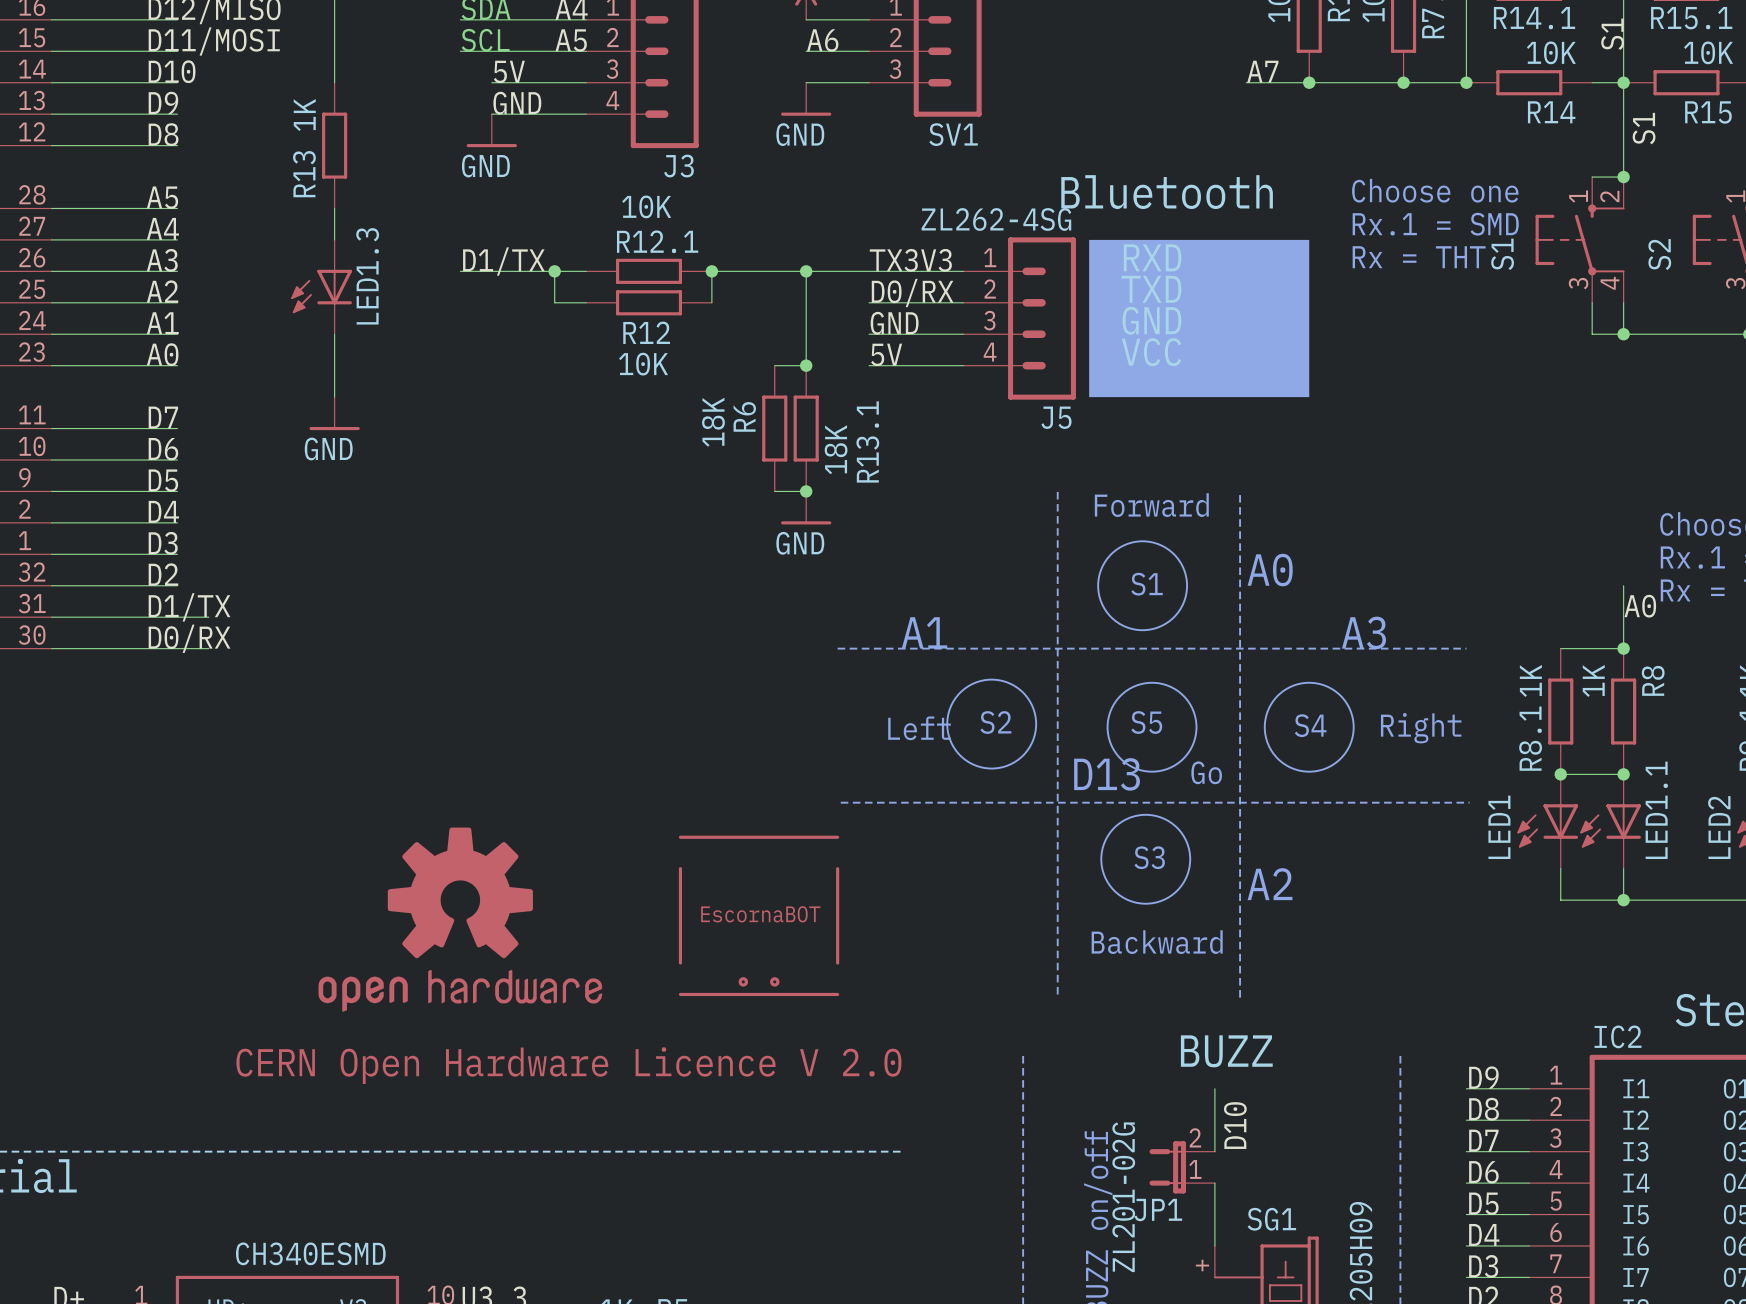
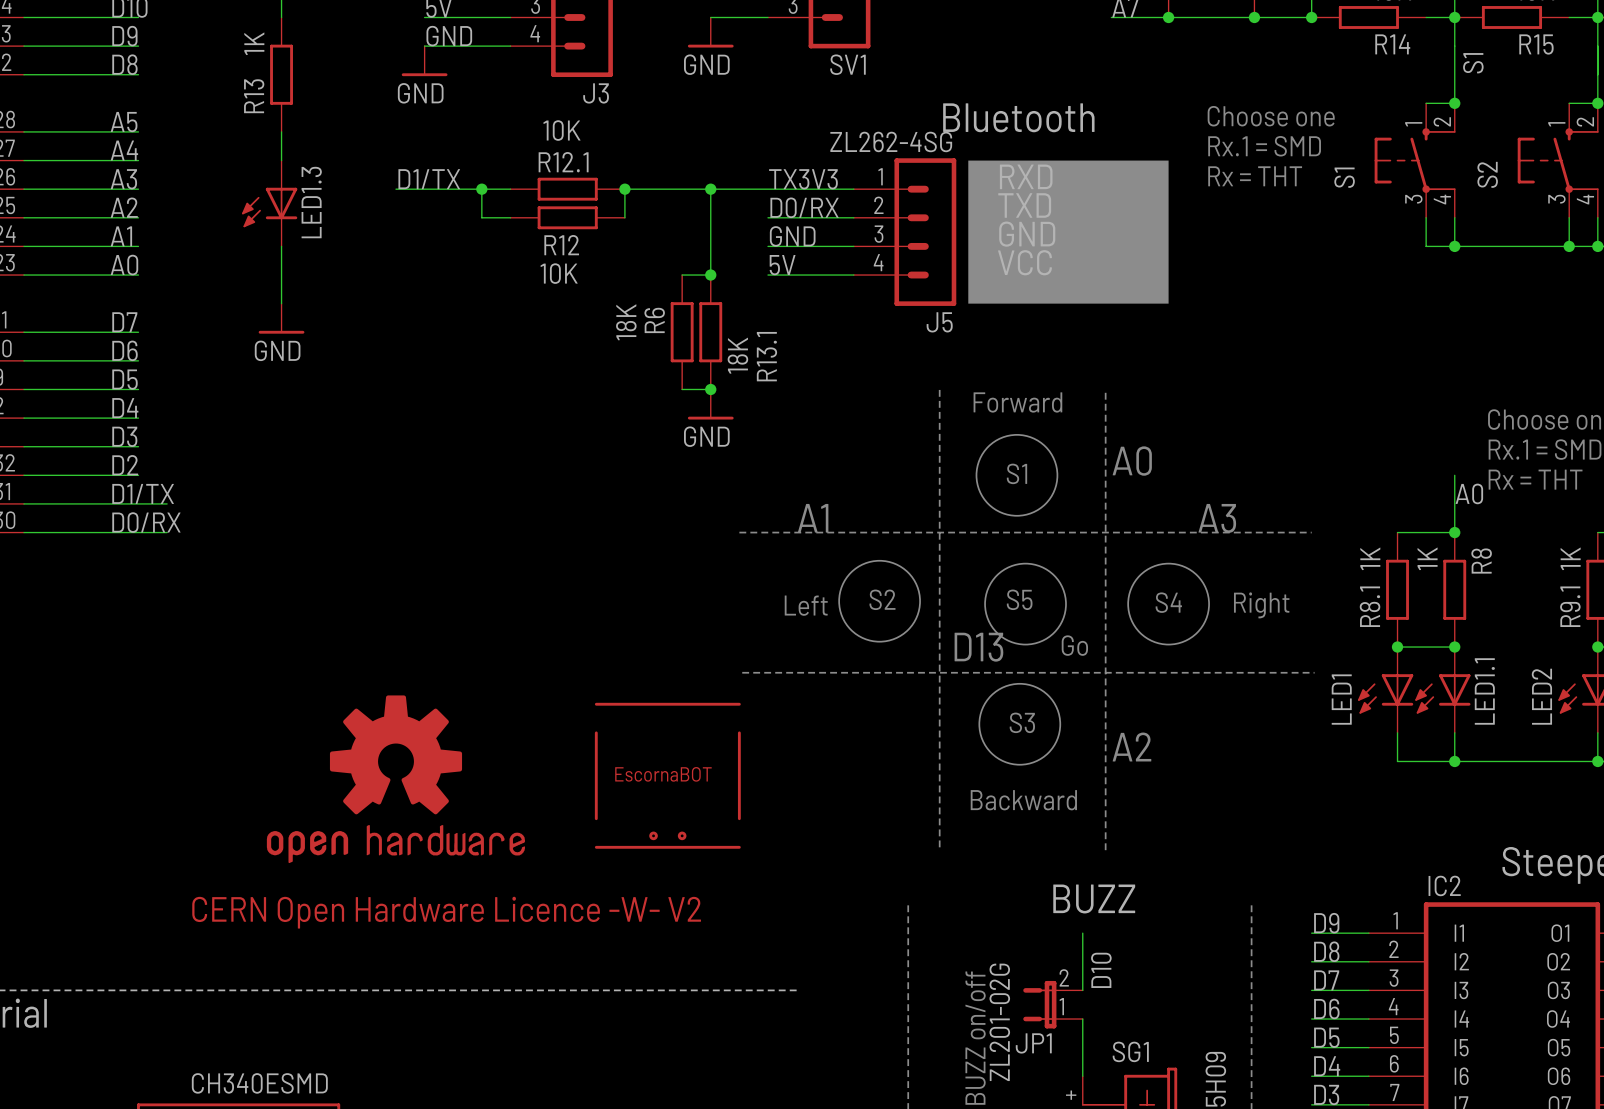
text: CERN Open Hardware Licence V 2.0 (568, 1065) -> CERN Open Hardware Licence -W- V2 (446, 912)

